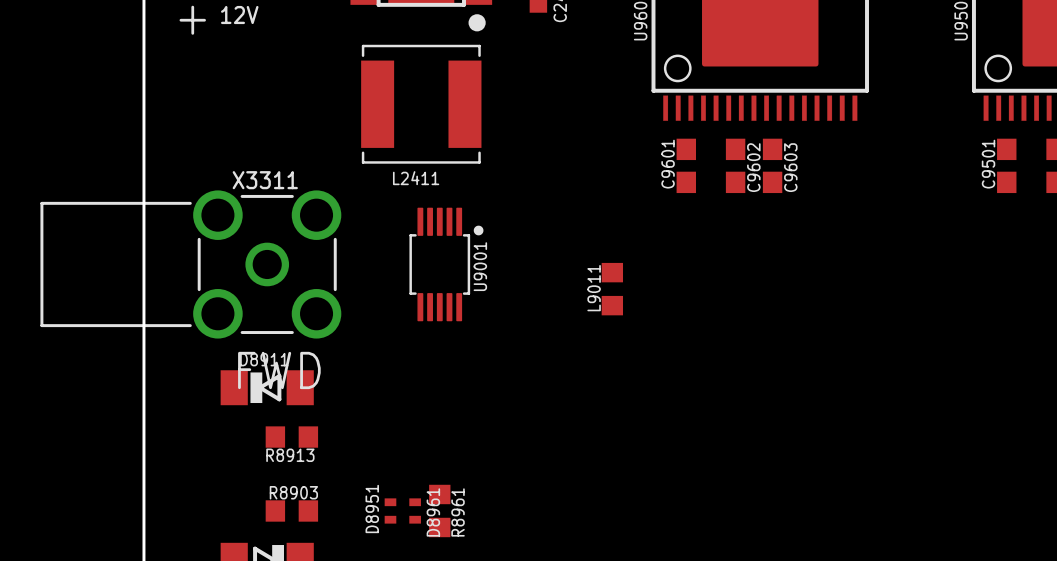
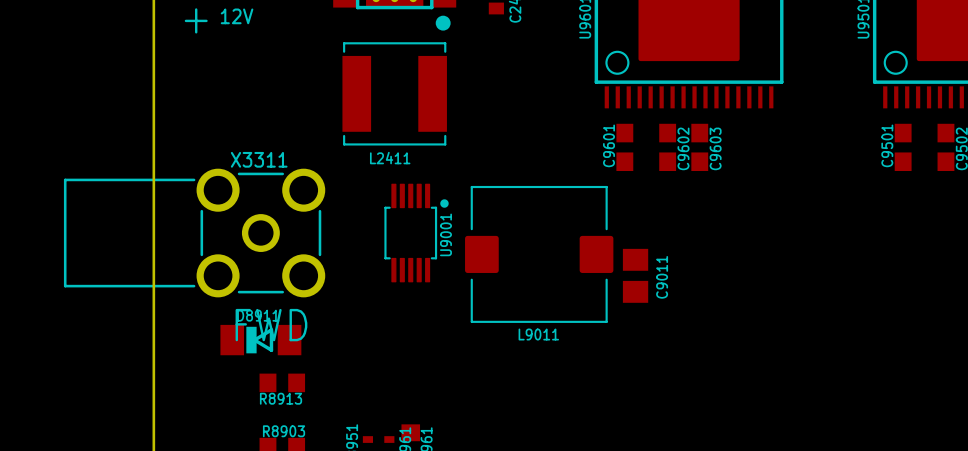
L9011 footprint: [601, 262, 624, 316] -> [465, 185, 614, 323]
L9011 name position: L9011 (594, 288) -> L9011 (538, 334)
C9011: none -> (635, 275)

